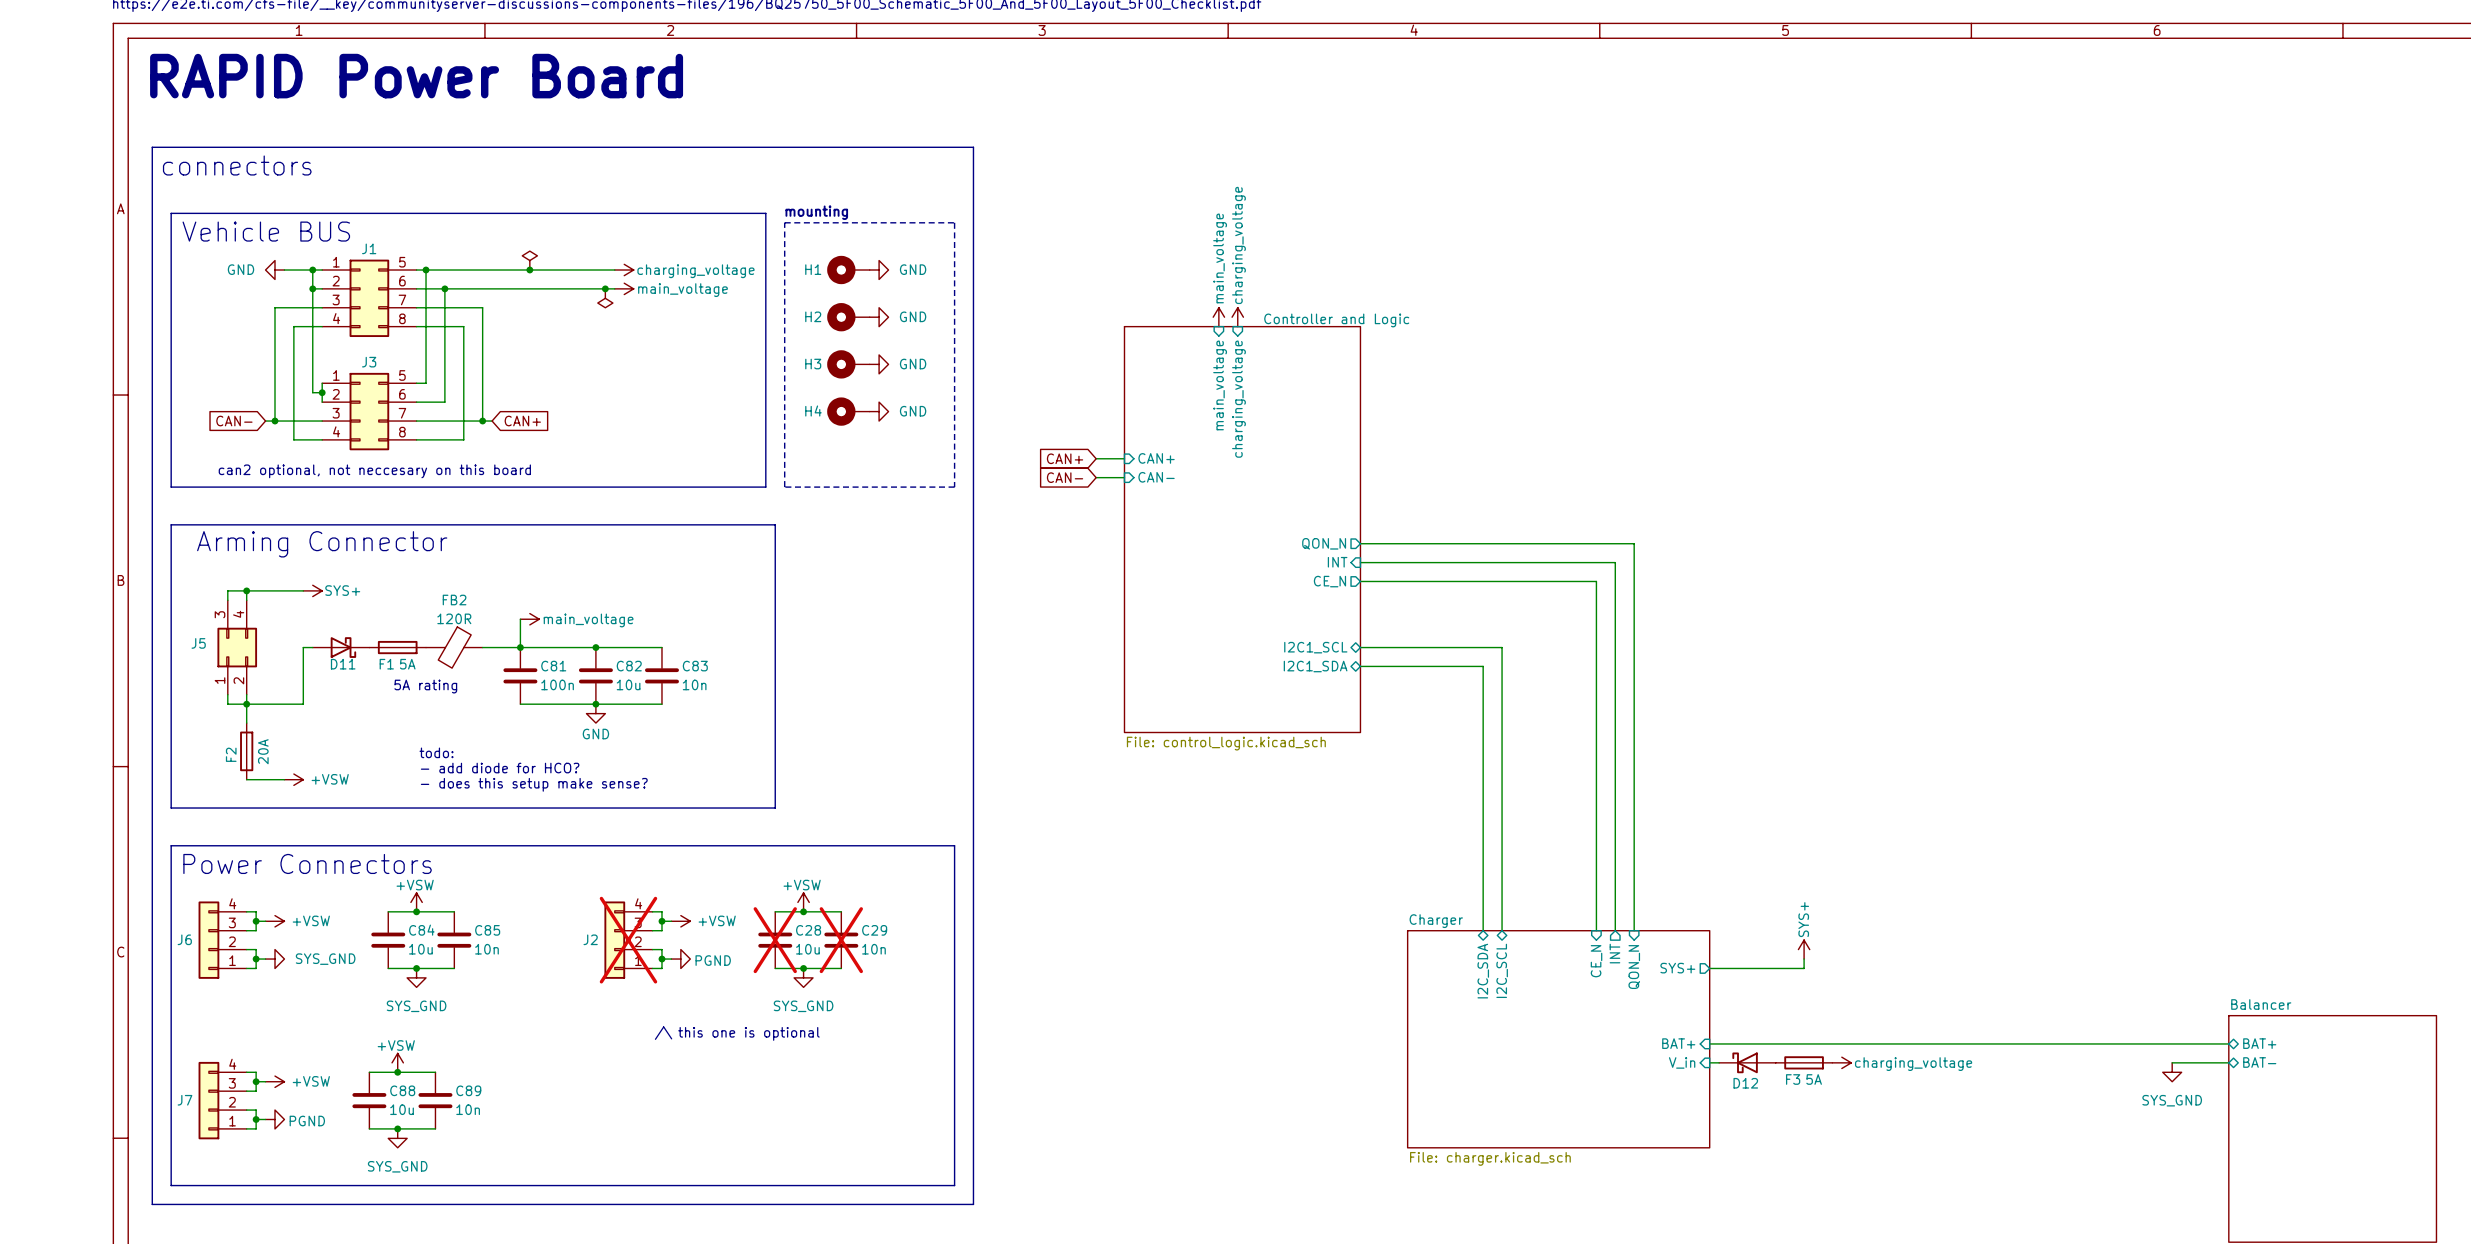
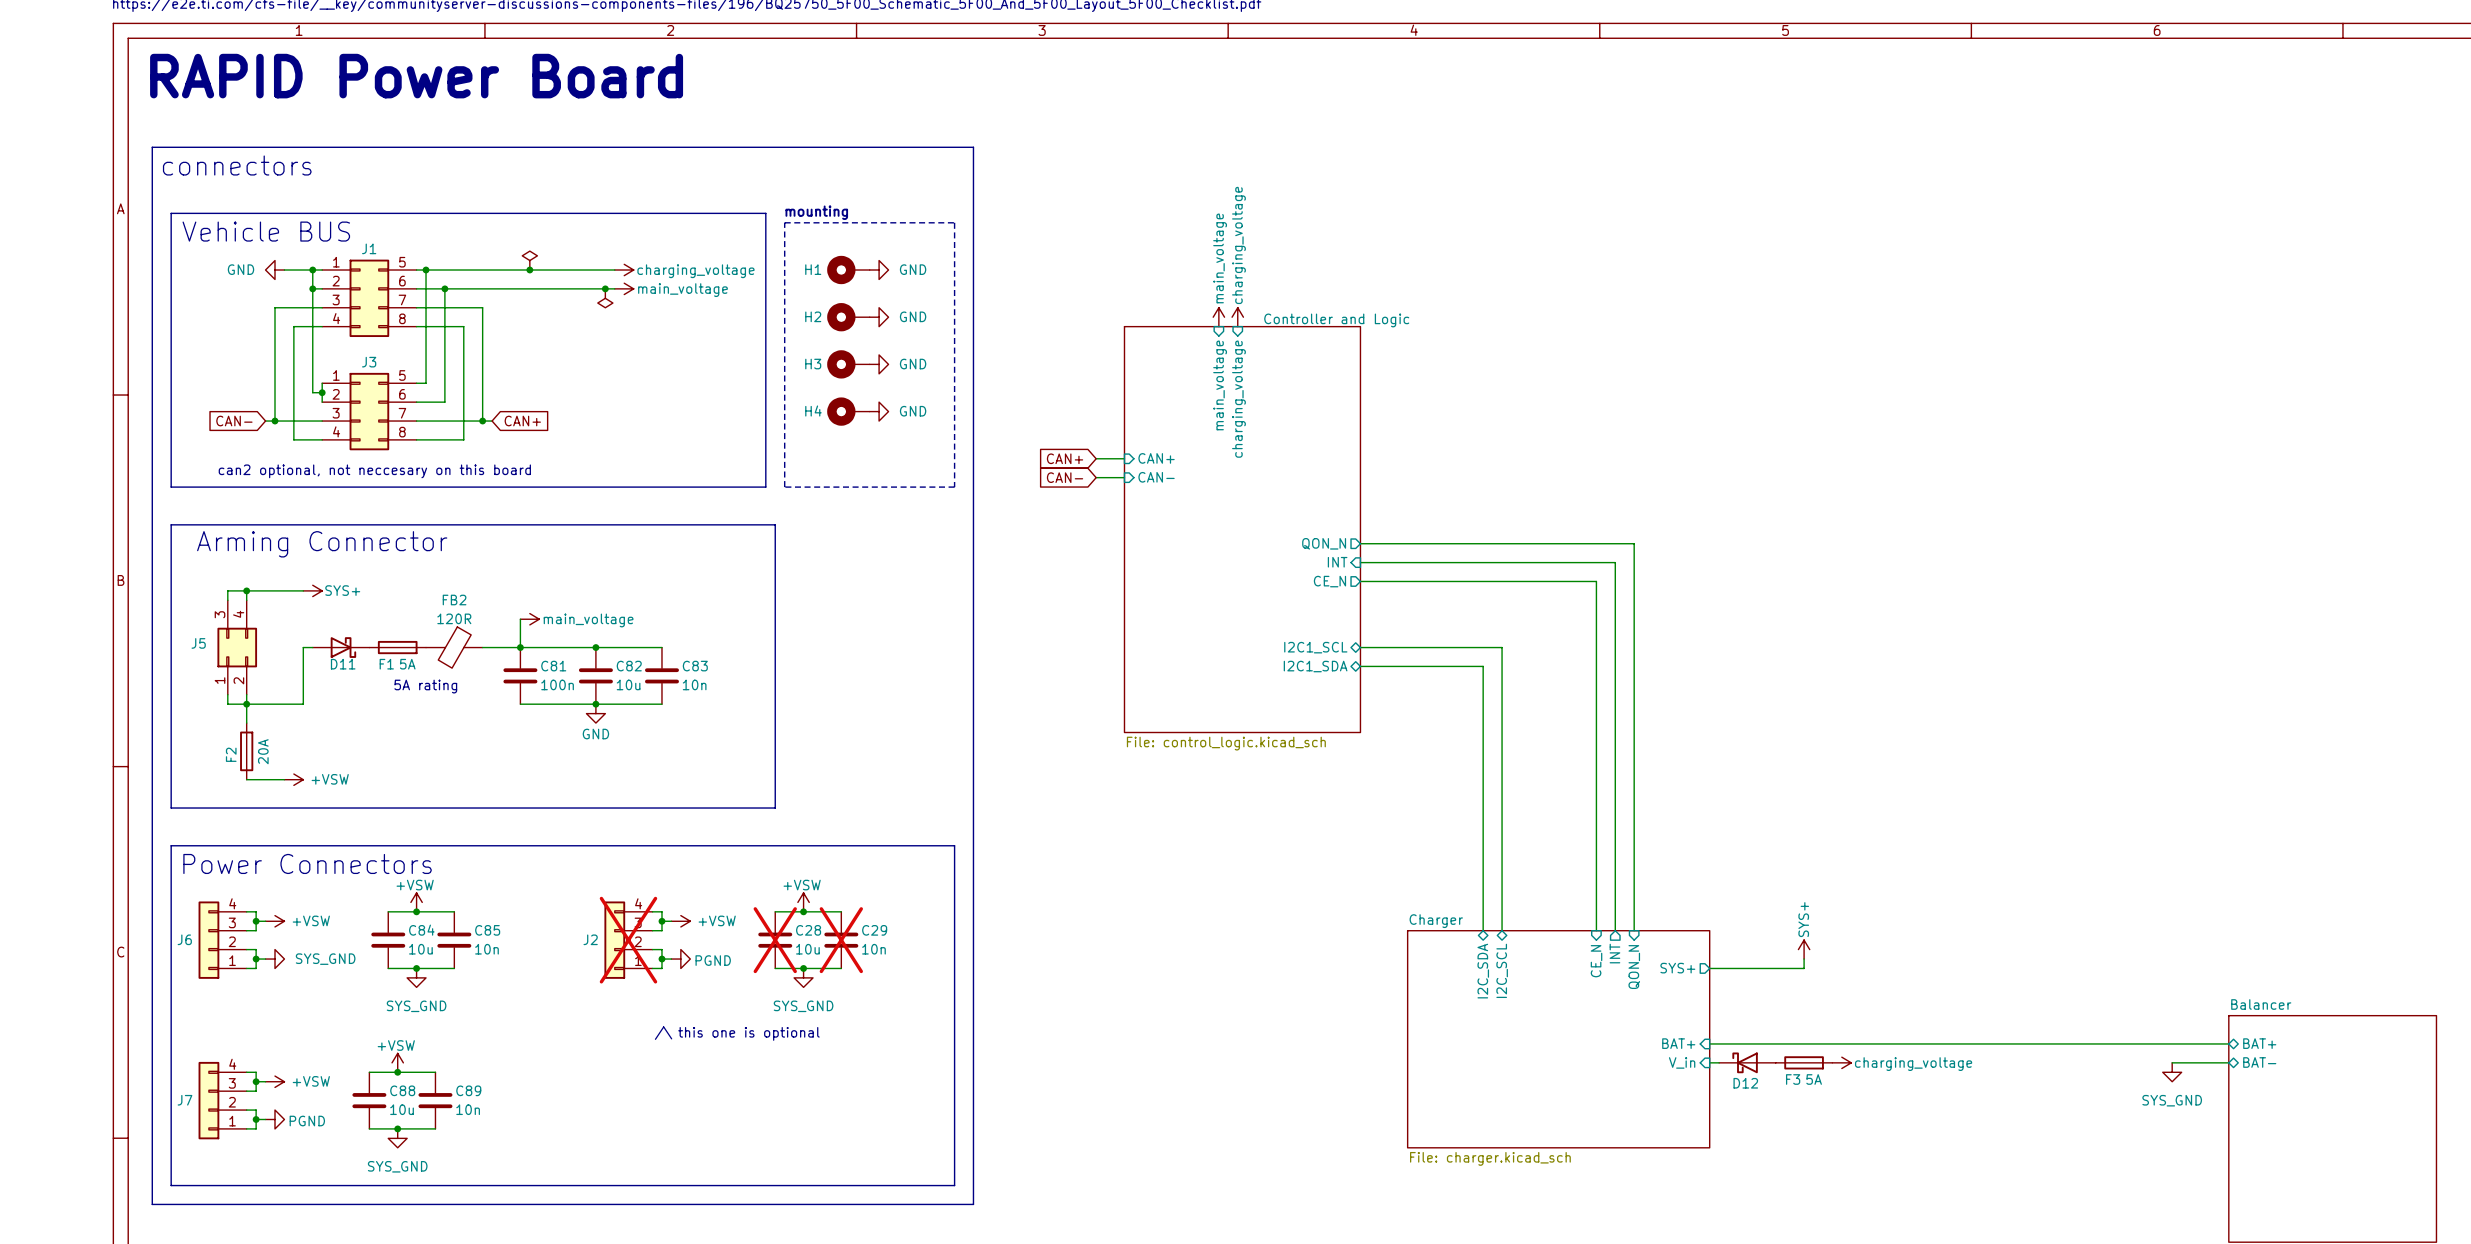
text: todo: (436, 752) -> none
text: - add diode for HCO? (500, 768) -> none
text: - does this setup make sense? (534, 784) -> none

